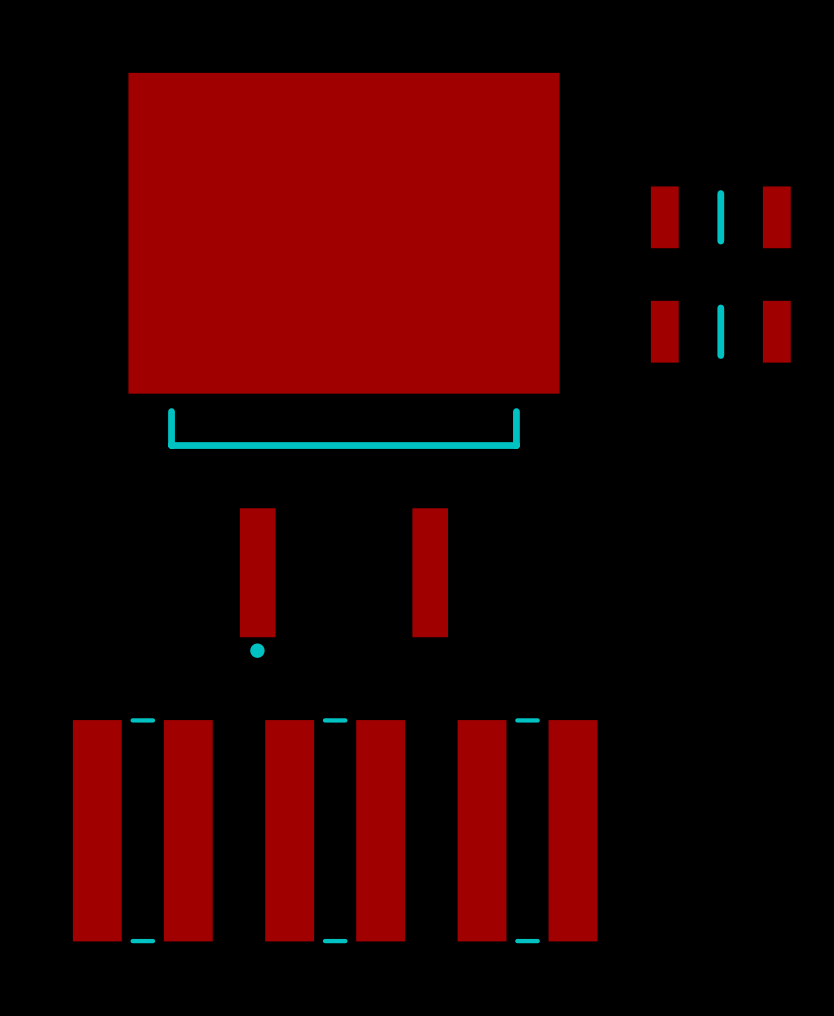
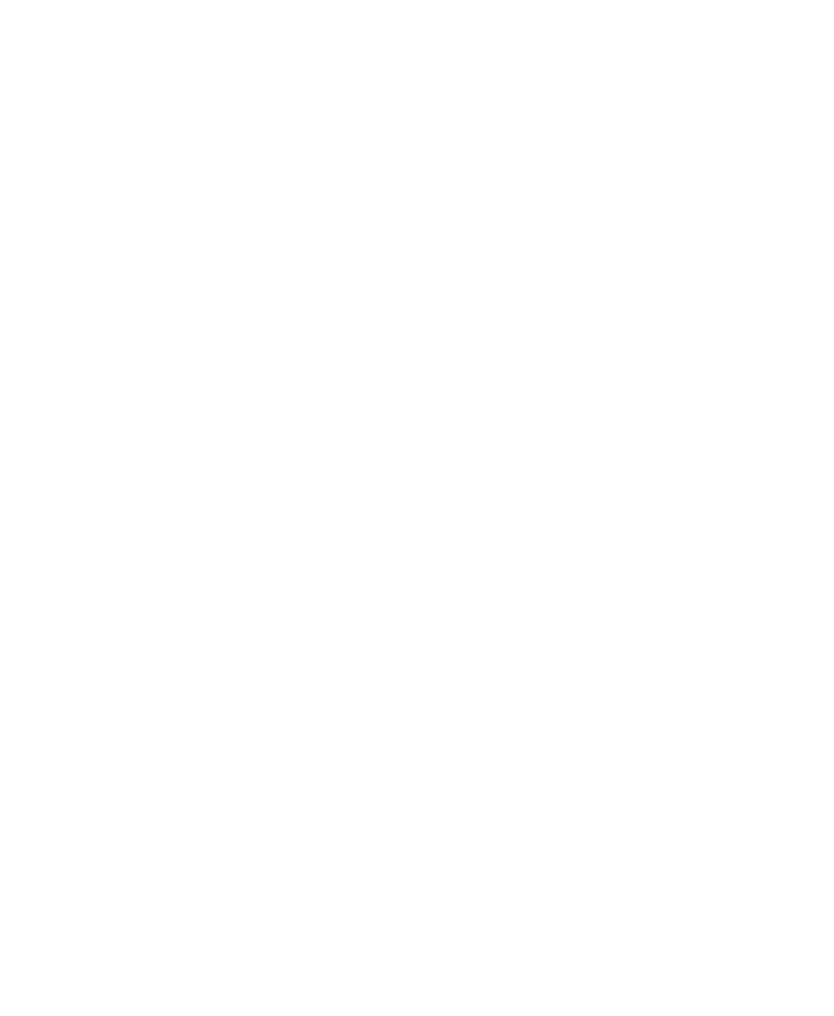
part: (720, 217) -> none
part: (720, 331) -> none
part: (343, 365) -> none
part: (142, 830) -> none
part: (335, 830) -> none
part: (527, 830) -> none

